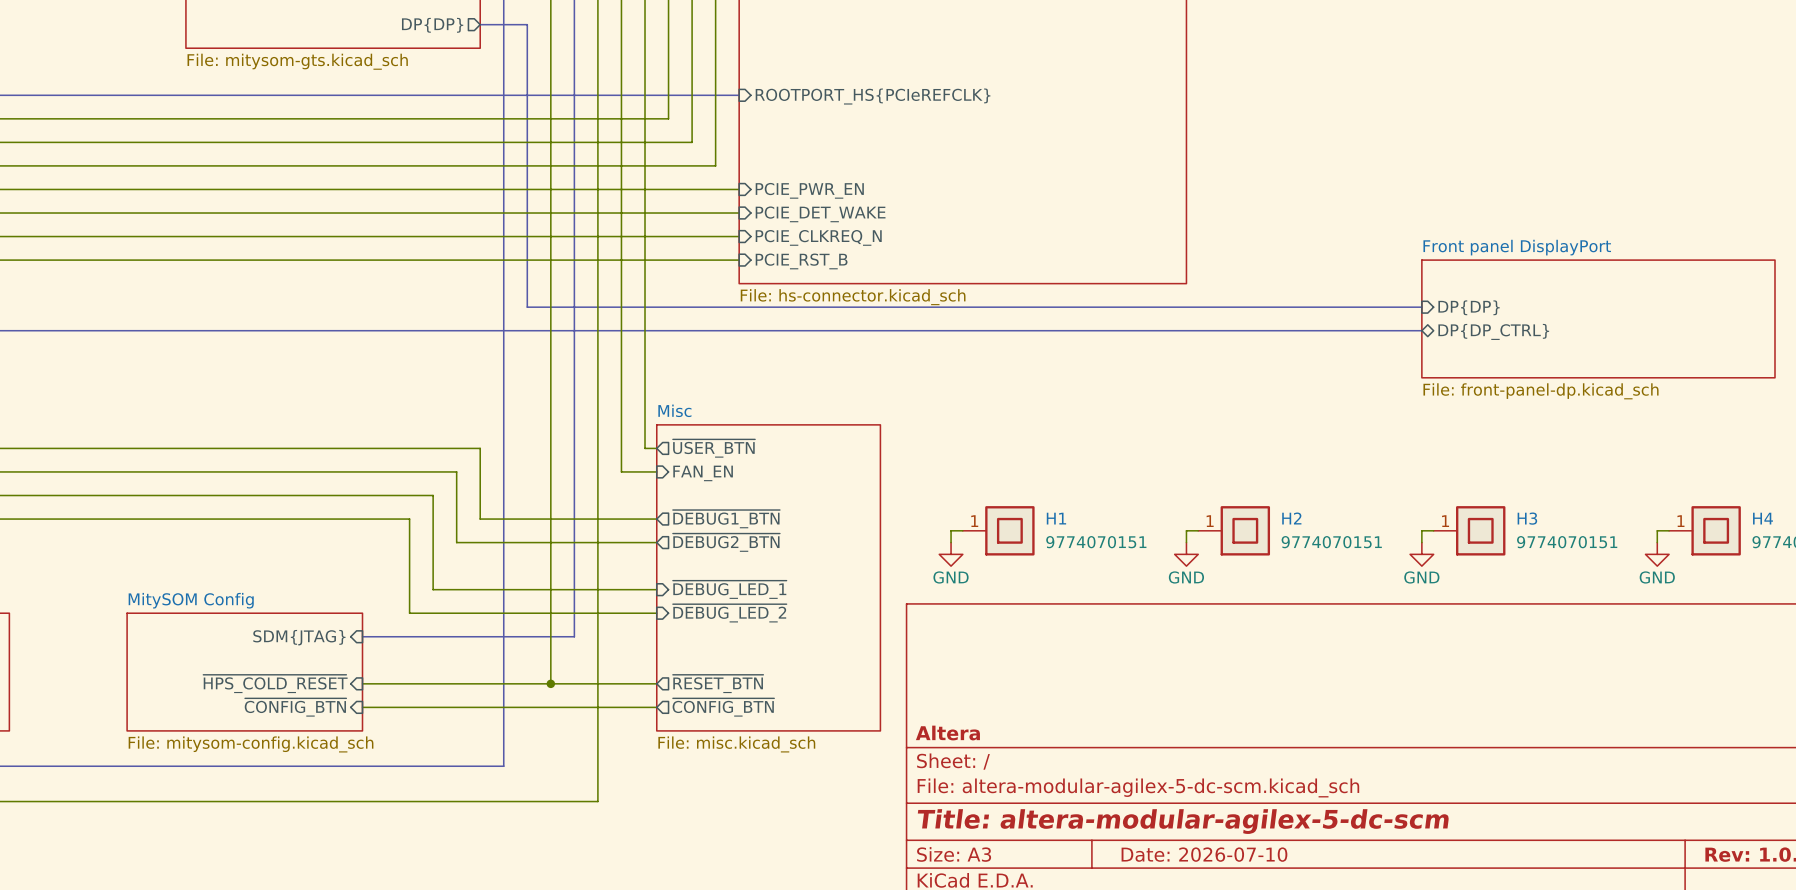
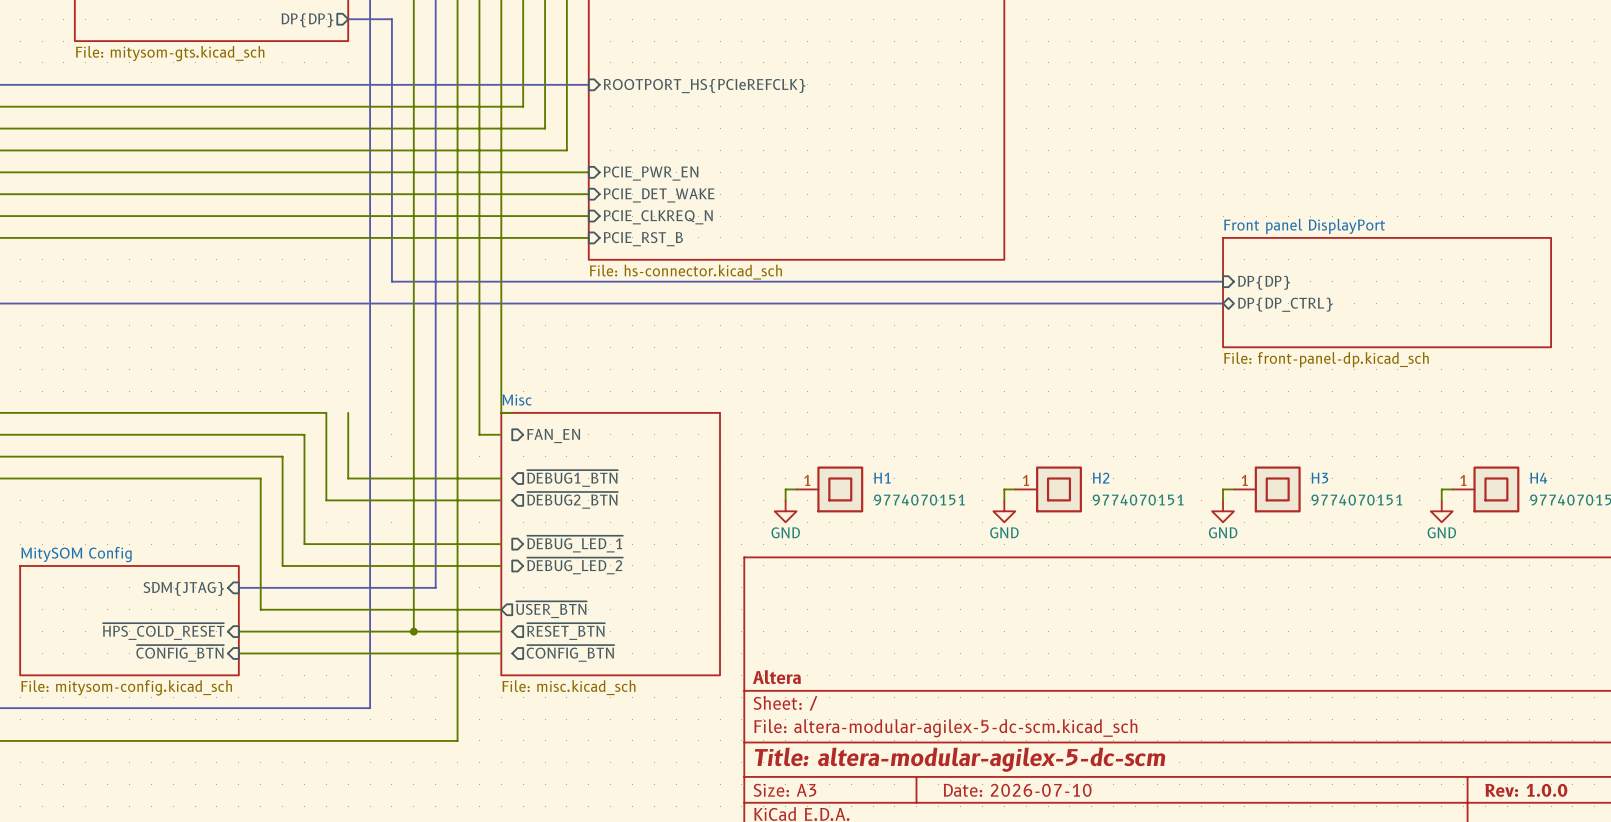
wire: (456, 448) (480, 448) -> (326, 412) (326, 434)
sheet pin position: ~{USER_BTN} (714, 448) -> ~{USER_BTN} (551, 609)
wire: (433, 471) (456, 471) -> (304, 434) (304, 456)
wire: (645, 471) (656, 471) -> none
wire: (409, 495) (433, 495) -> (282, 456) (282, 478)
wire: (386, 519) (409, 519) -> (260, 478) (260, 609) (501, 609)
wire: (645, 519) (656, 519) -> none
wire: (645, 542) (656, 542) -> none
sheet Misc: File: misc.kicad_sch (768, 577) -> none
wire: (645, 589) (656, 589) -> none
sheet Misc: none -> File: misc.kicad_sch (610, 544)
wire: (645, 613) (656, 613) -> none
wire: (645, 683) (656, 683) -> none
wire: (645, 707) (656, 707) -> none

